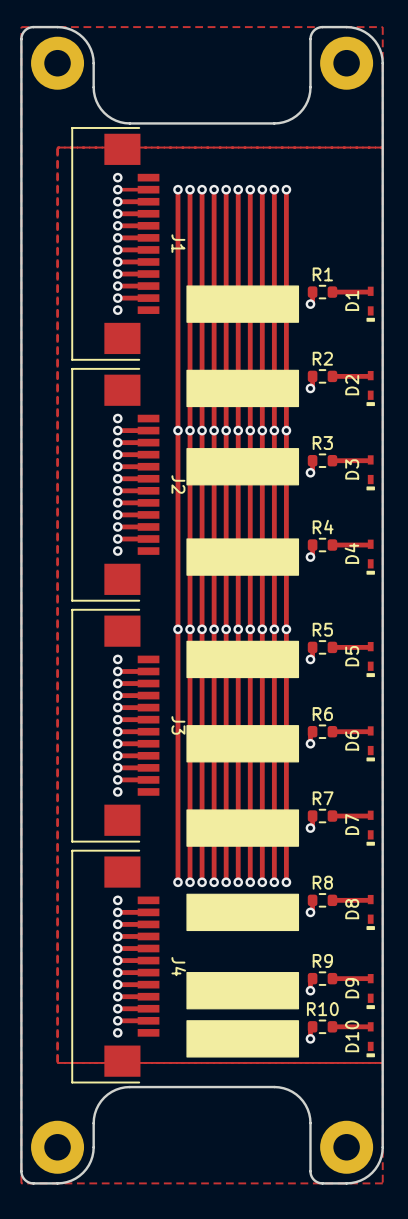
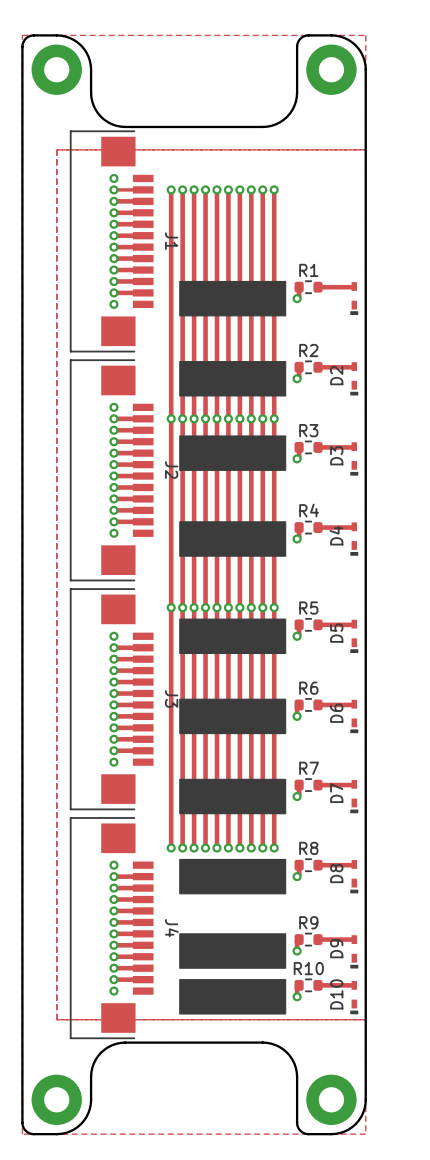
part: none -> (354, 298)
D1: (370, 304) -> none

